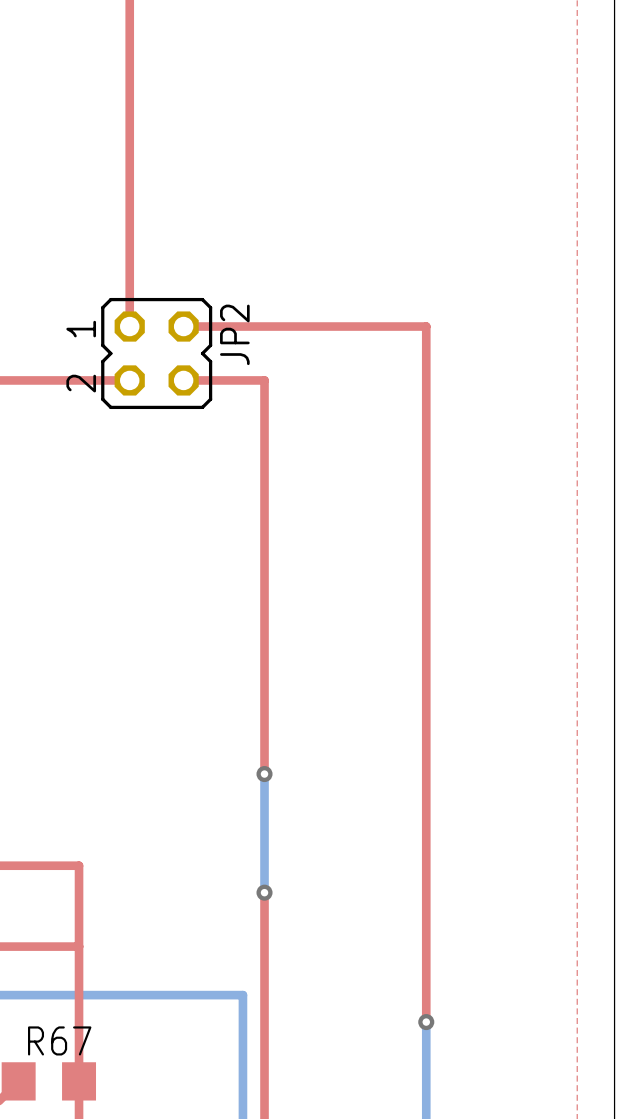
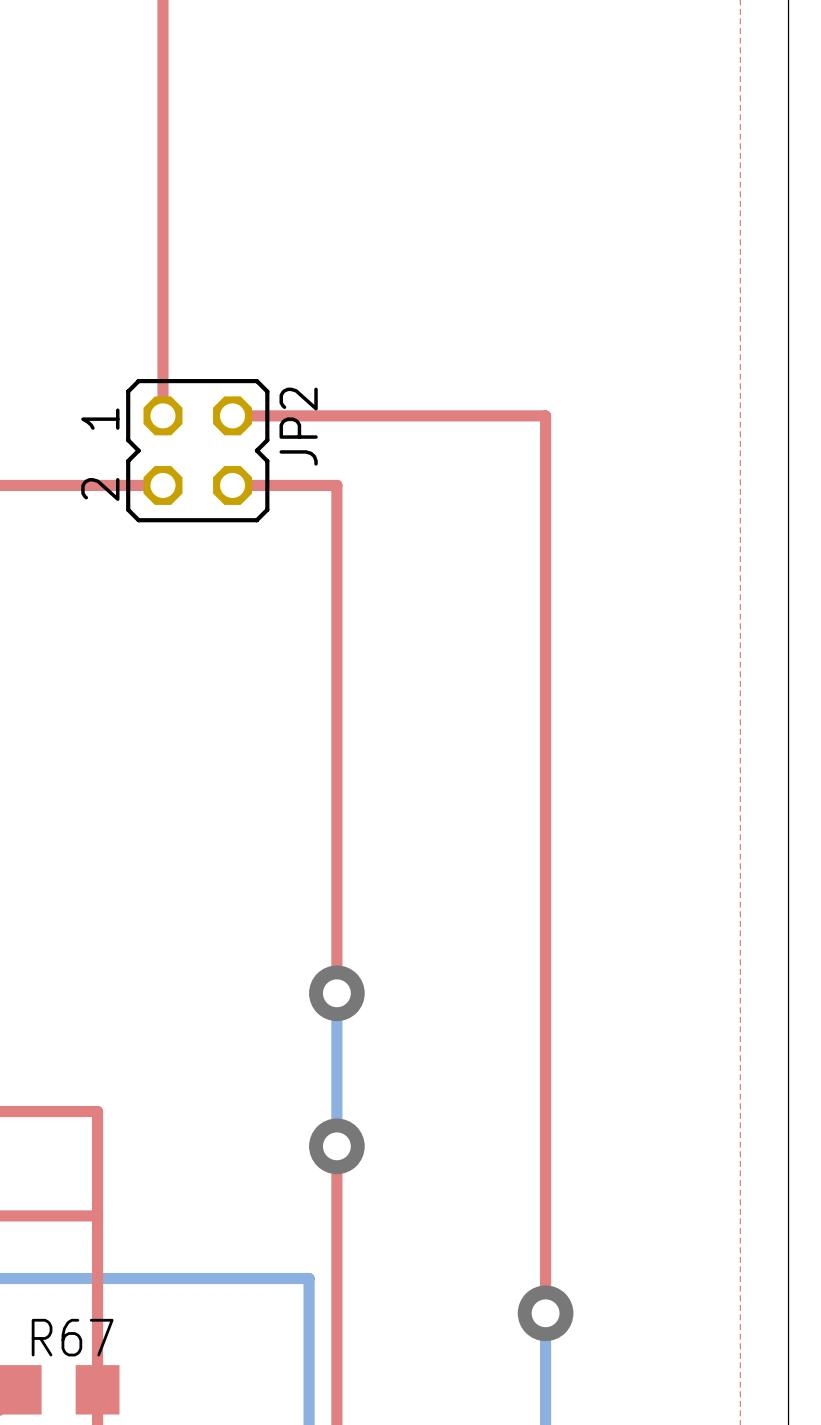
via size: [256, 766, 273, 783] -> [309, 965, 365, 1022]
via size: [256, 884, 273, 901] -> [309, 1118, 365, 1175]
via size: [418, 1014, 435, 1031] -> [517, 1285, 574, 1342]

